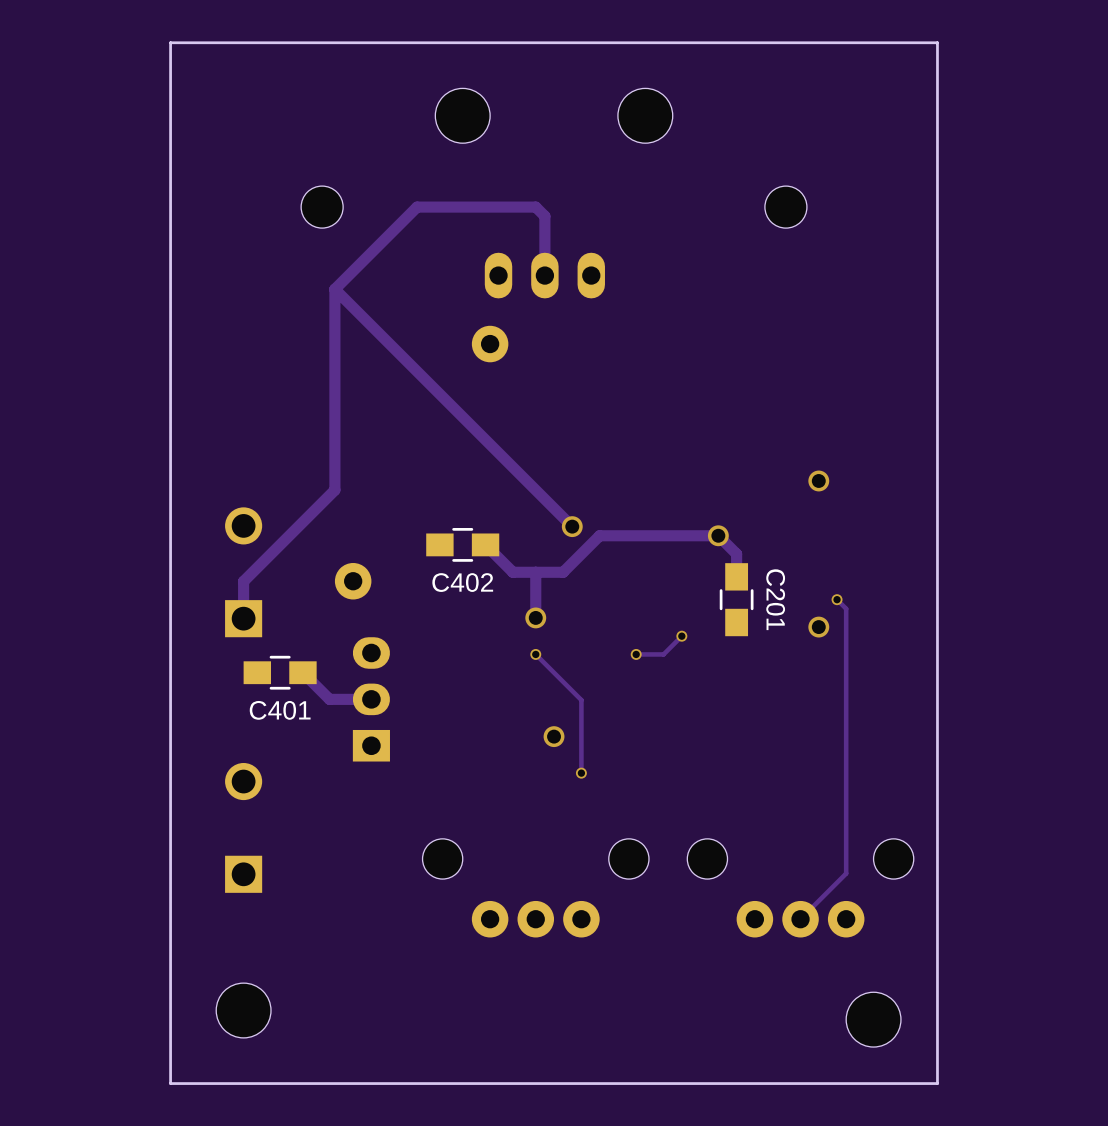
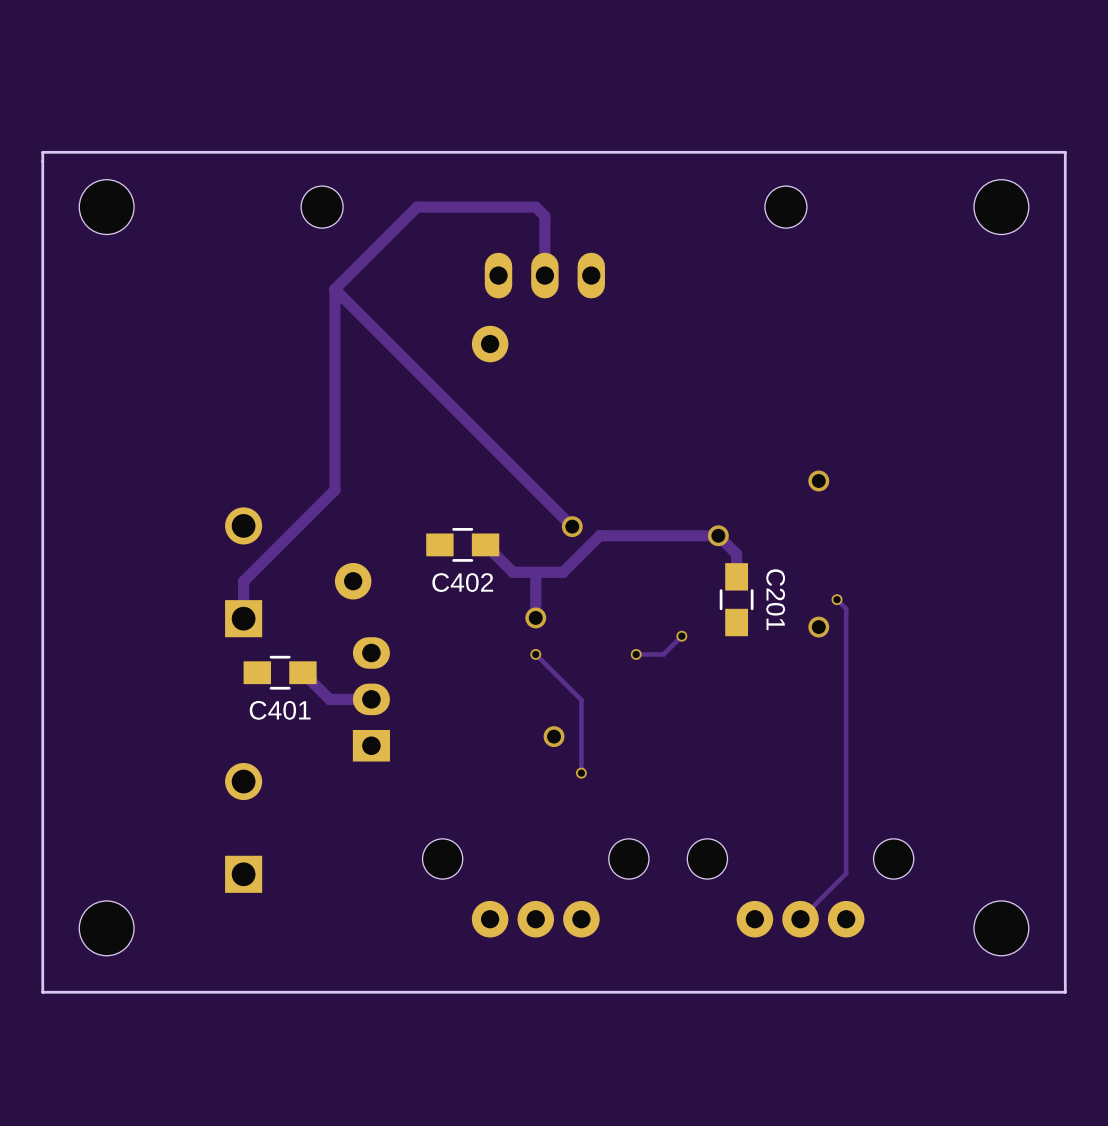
board edge: (937, 42) (170, 42) (170, 1083) (937, 1083) (937, 42) -> (1065, 152) (1065, 992) (42, 992) (42, 152) (1065, 152)
part: (462, 115) -> none
part: (645, 115) -> none
part: none -> (106, 207)
part: none -> (1001, 207)
part position: (243, 1010) -> (106, 928)
part position: (873, 1019) -> (1001, 928)

